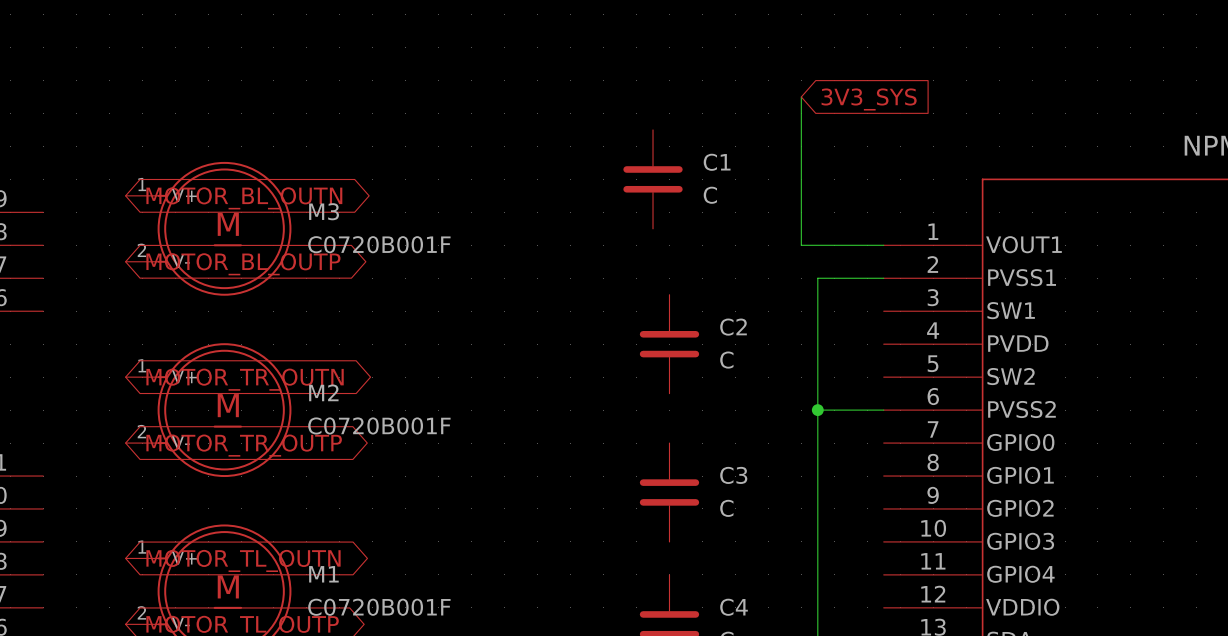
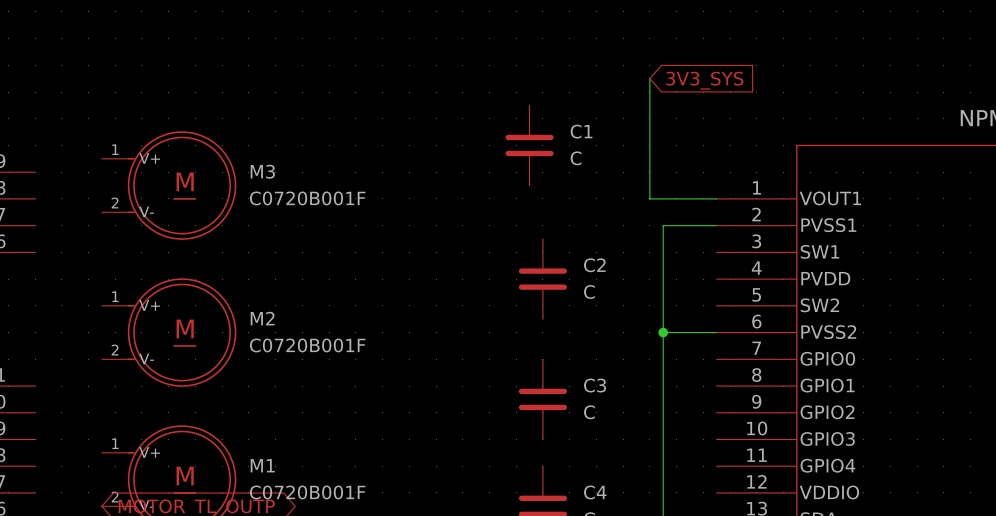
global label: MOTOR_BL_OUTN (244, 198) -> none
global label: MOTOR_BL_OUTP (243, 264) -> none
global label: MOTOR_TR_OUTN (245, 379) -> none
global label: MOTOR_TR_OUTP (244, 445) -> none
global label: MOTOR_TL_OUTN (243, 560) -> none

